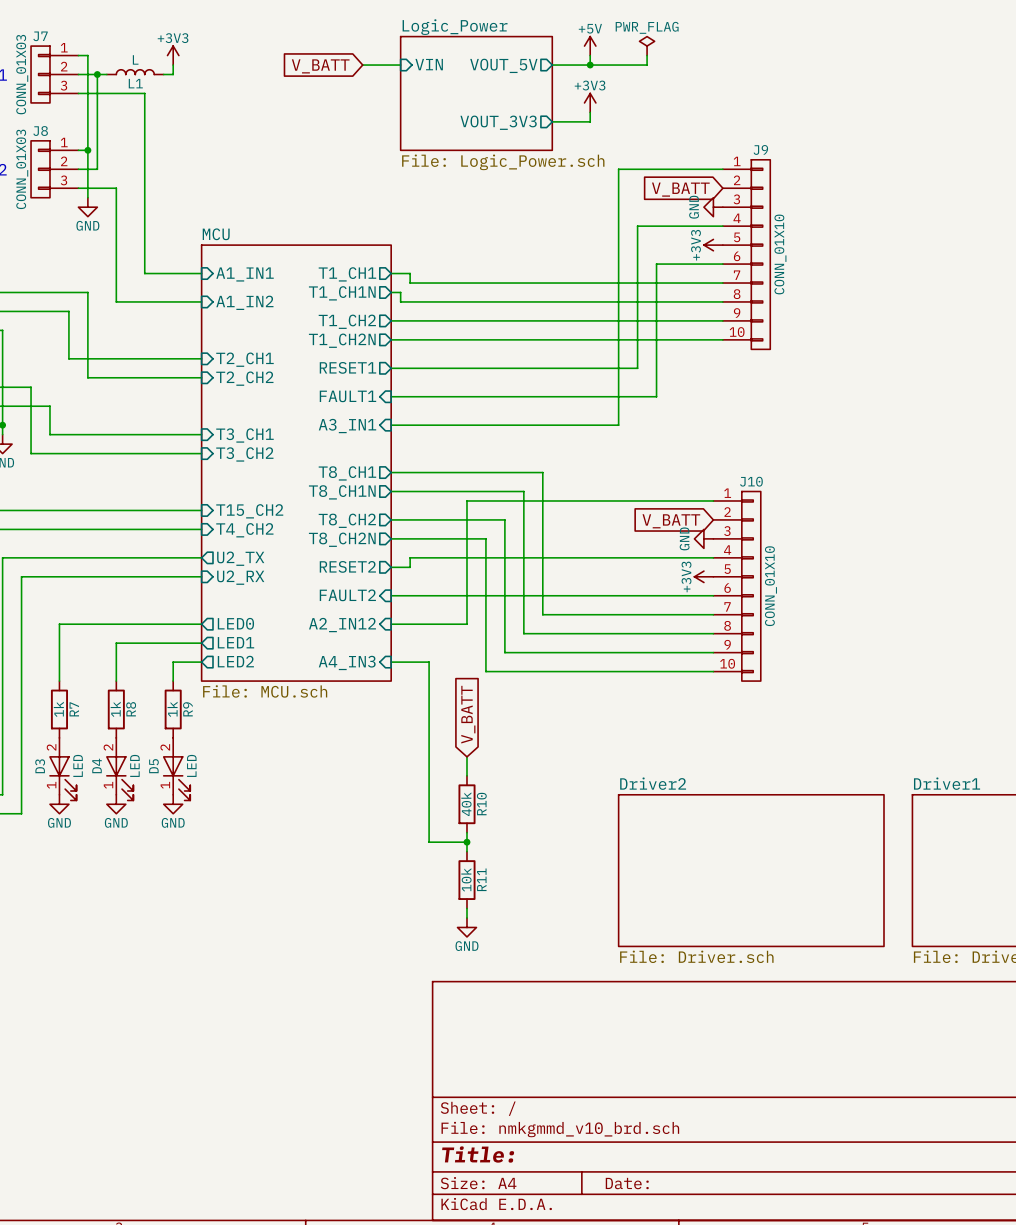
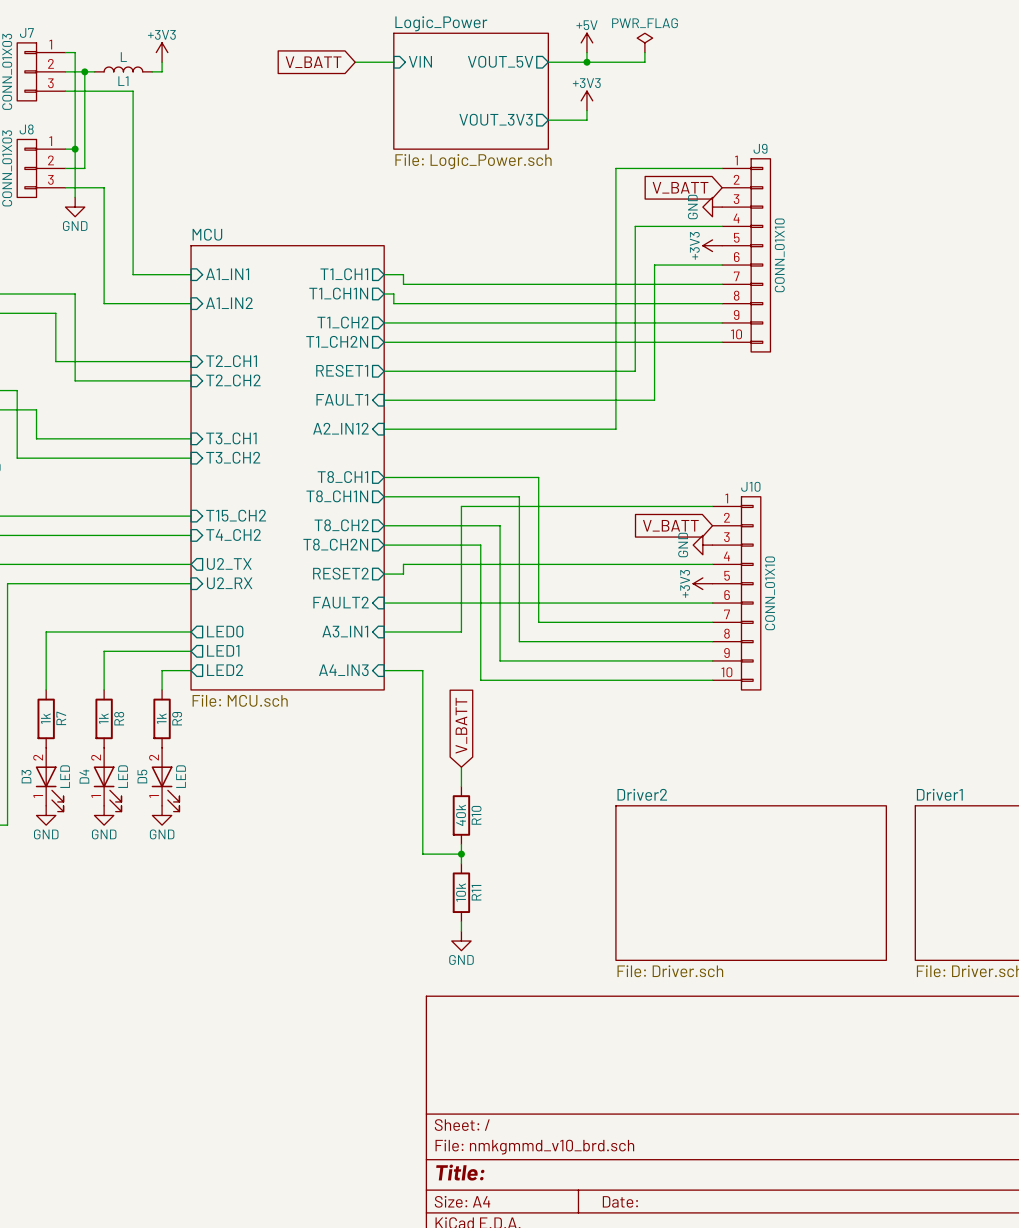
sheet pin: A3_IN1 (347, 426) -> A2_IN12 (340, 428)
sheet pin: A2_IN12 (342, 625) -> A3_IN1 (345, 631)

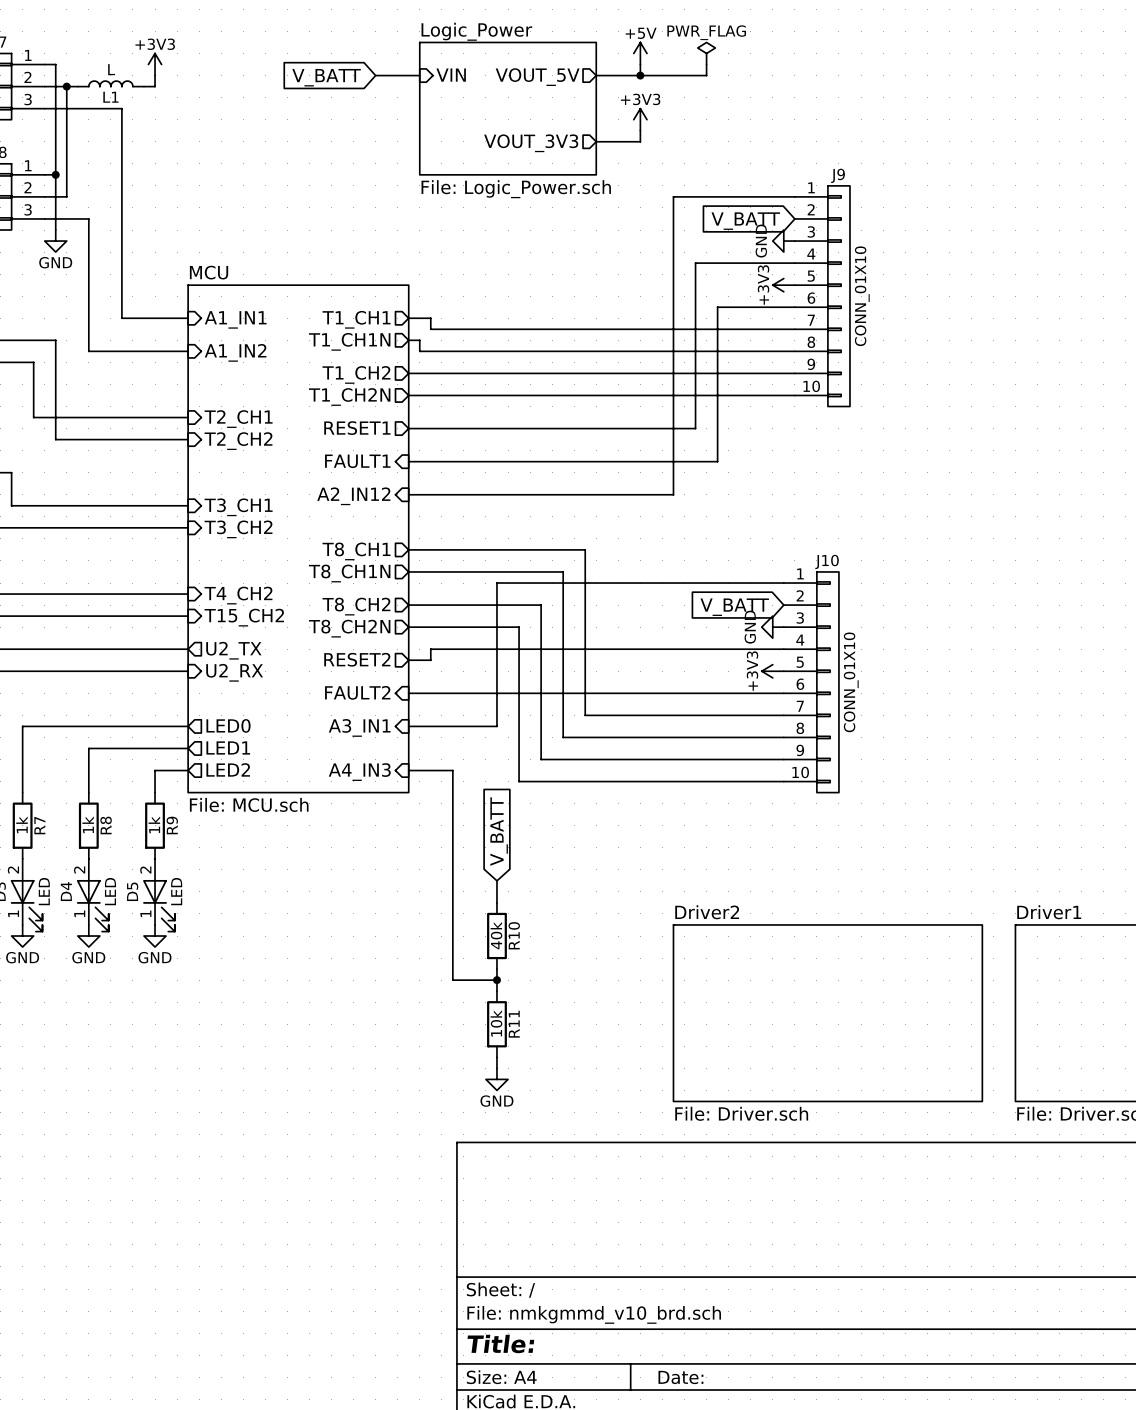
sheet pin: T15_CH2 (236, 515) -> T4_CH2 (238, 595)
sheet pin: T4_CH2 (233, 535) -> T15_CH2 (244, 617)

